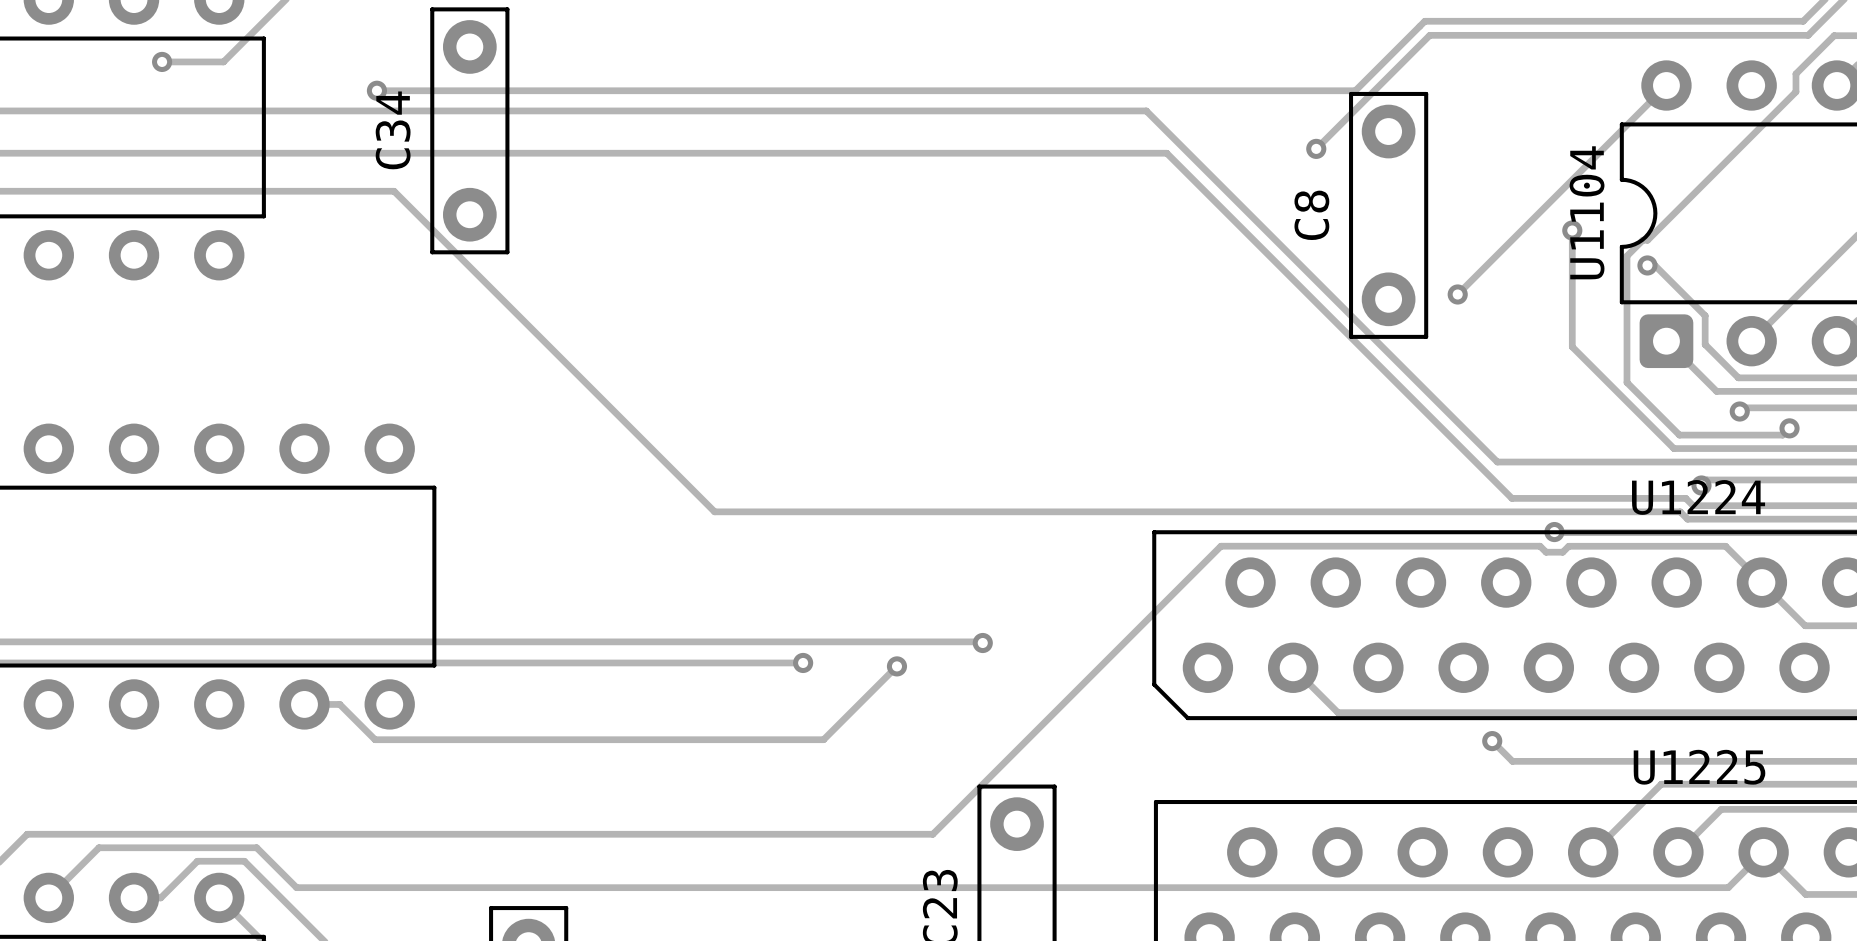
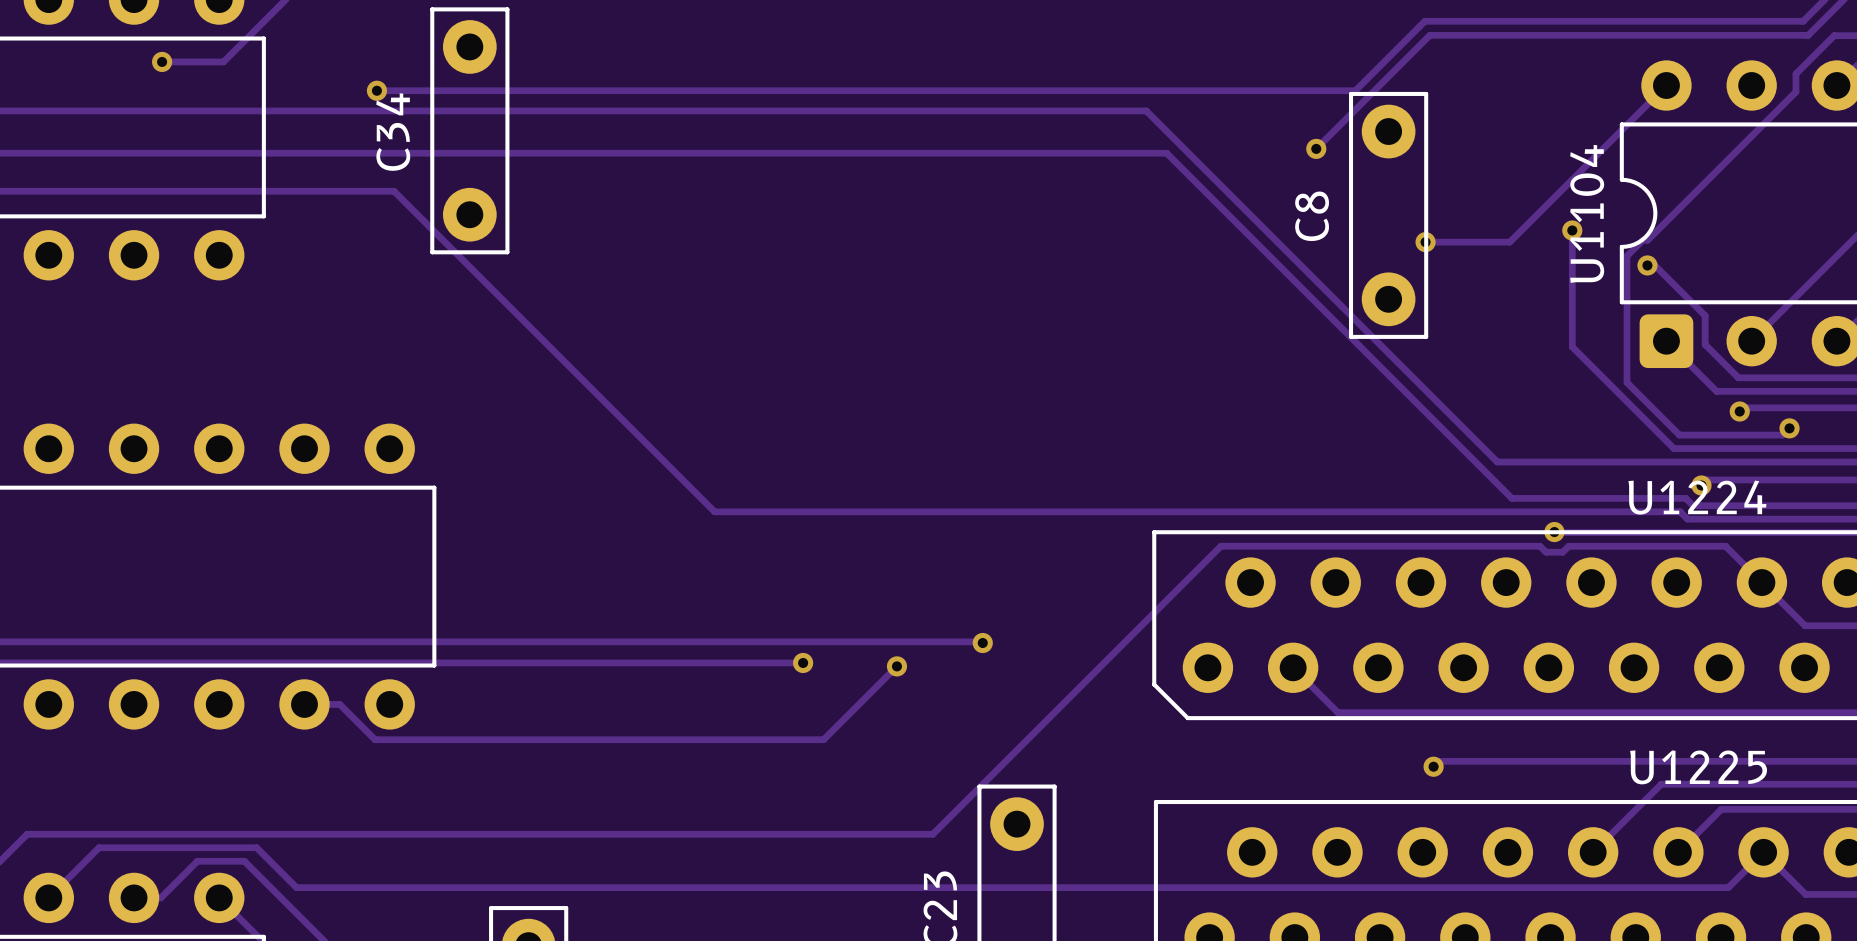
track: (1666, 85) (1457, 294) -> (1666, 85) (1509, 242) (1425, 242)
via position: (1457, 294) -> (1425, 242)
track: (1492, 741) (1512, 761) -> (1433, 766) (1438, 761) (1512, 761)
via position: (1492, 741) -> (1433, 766)

